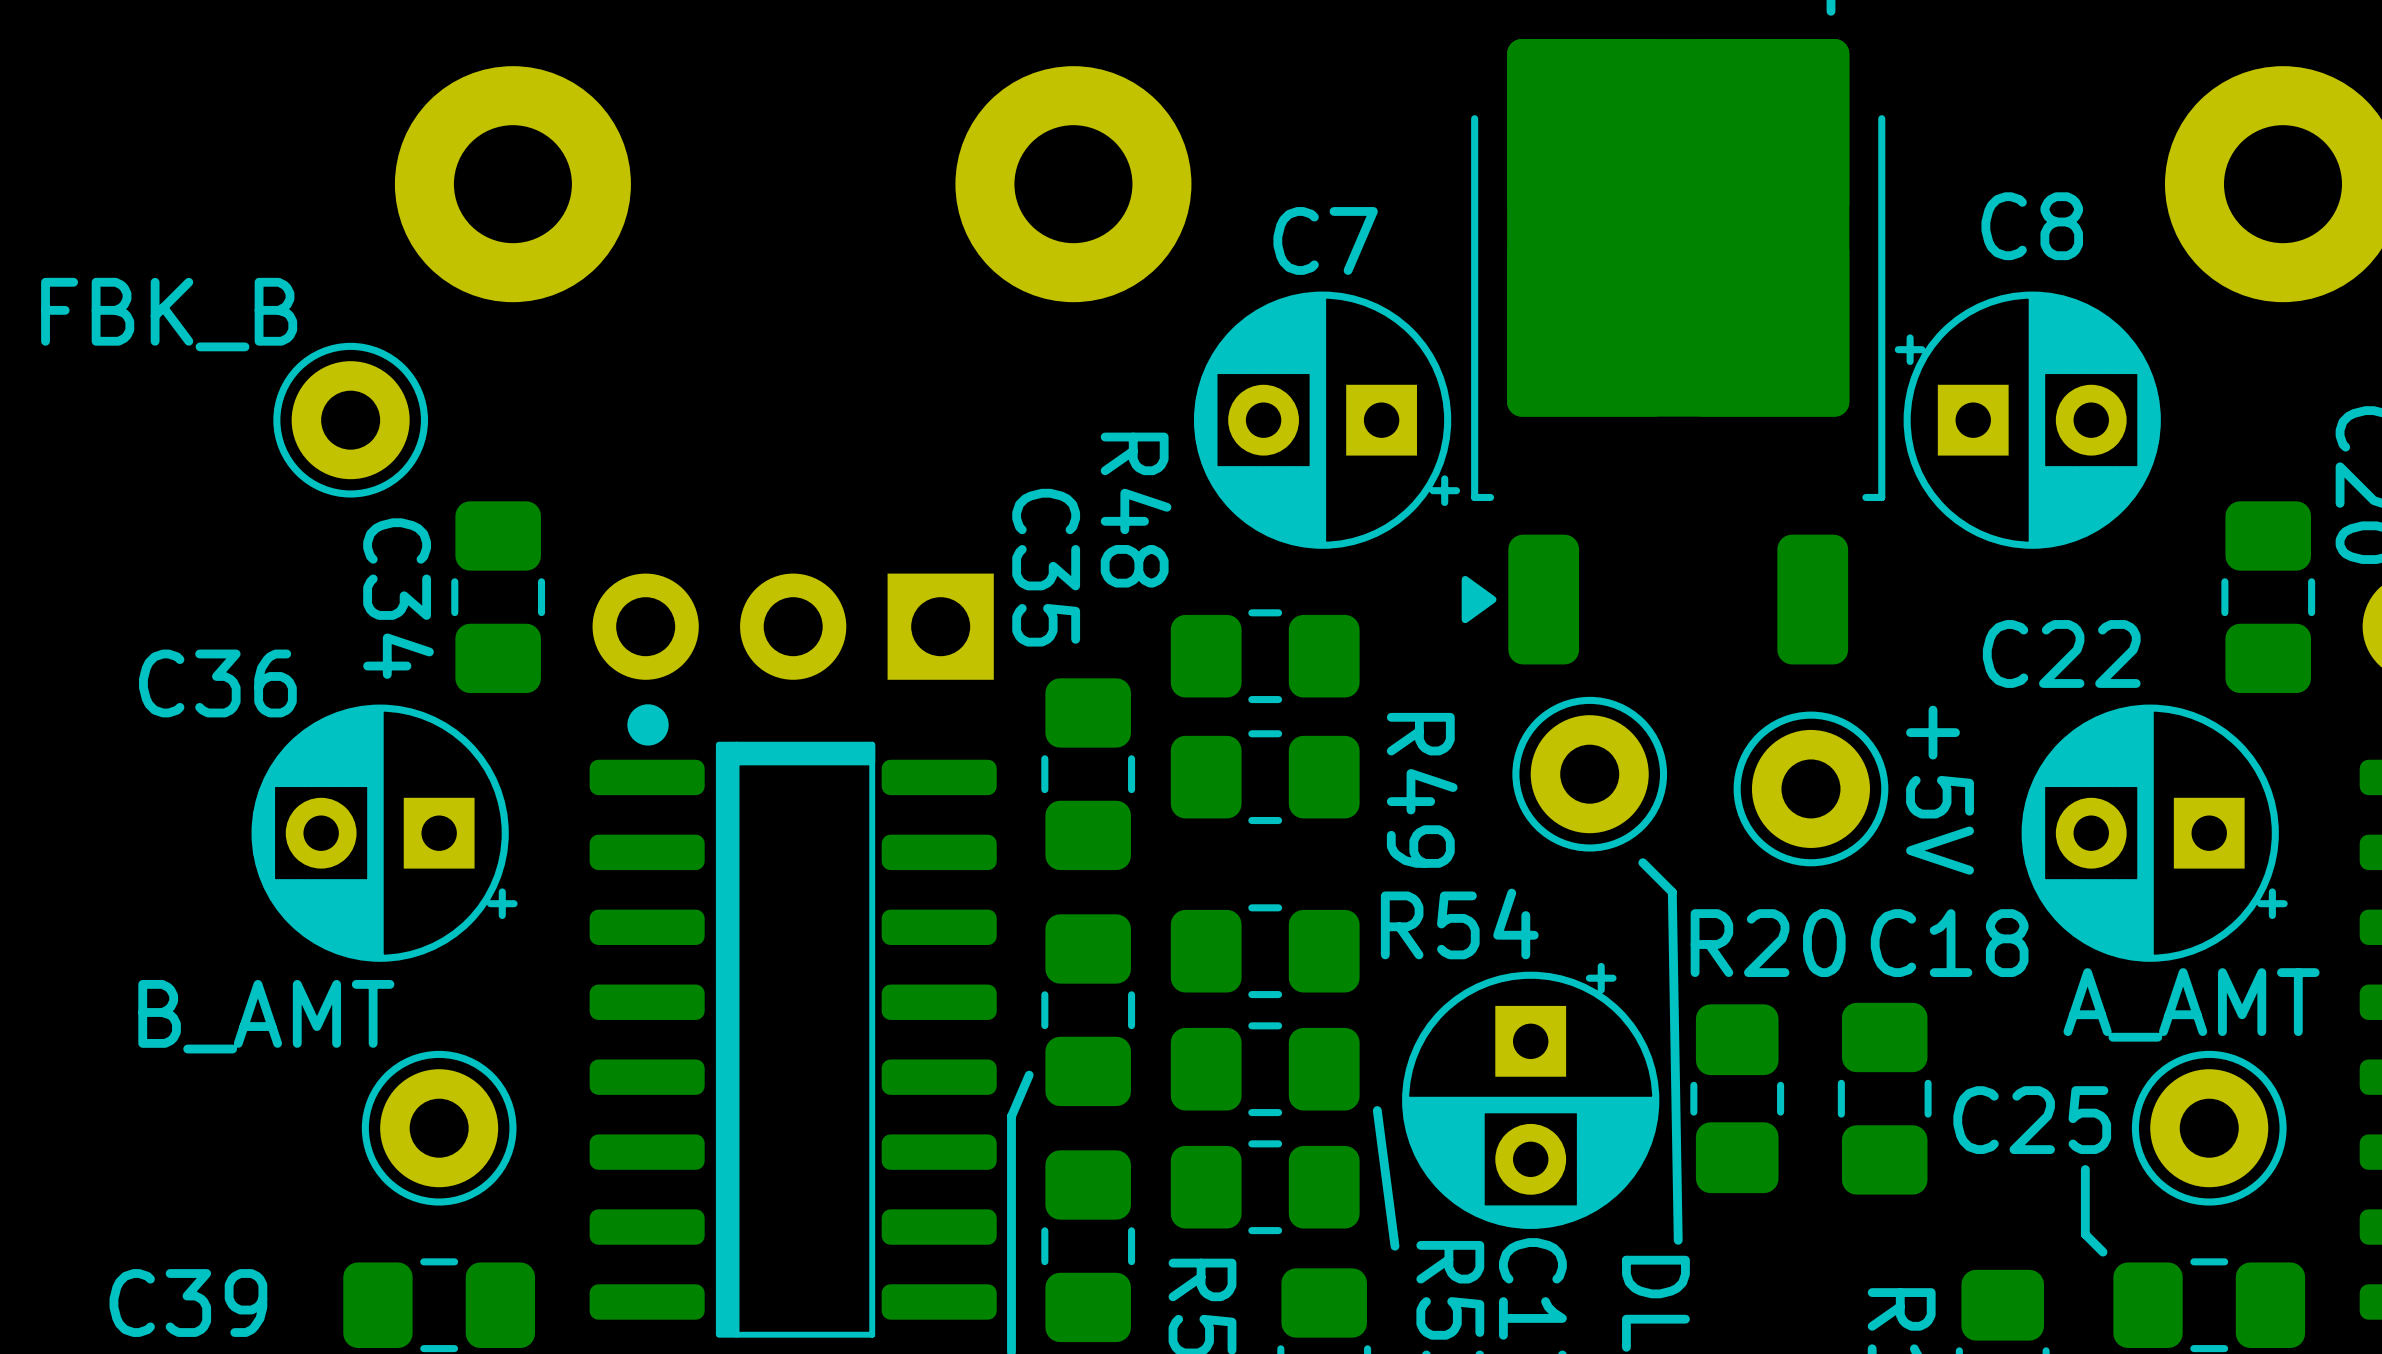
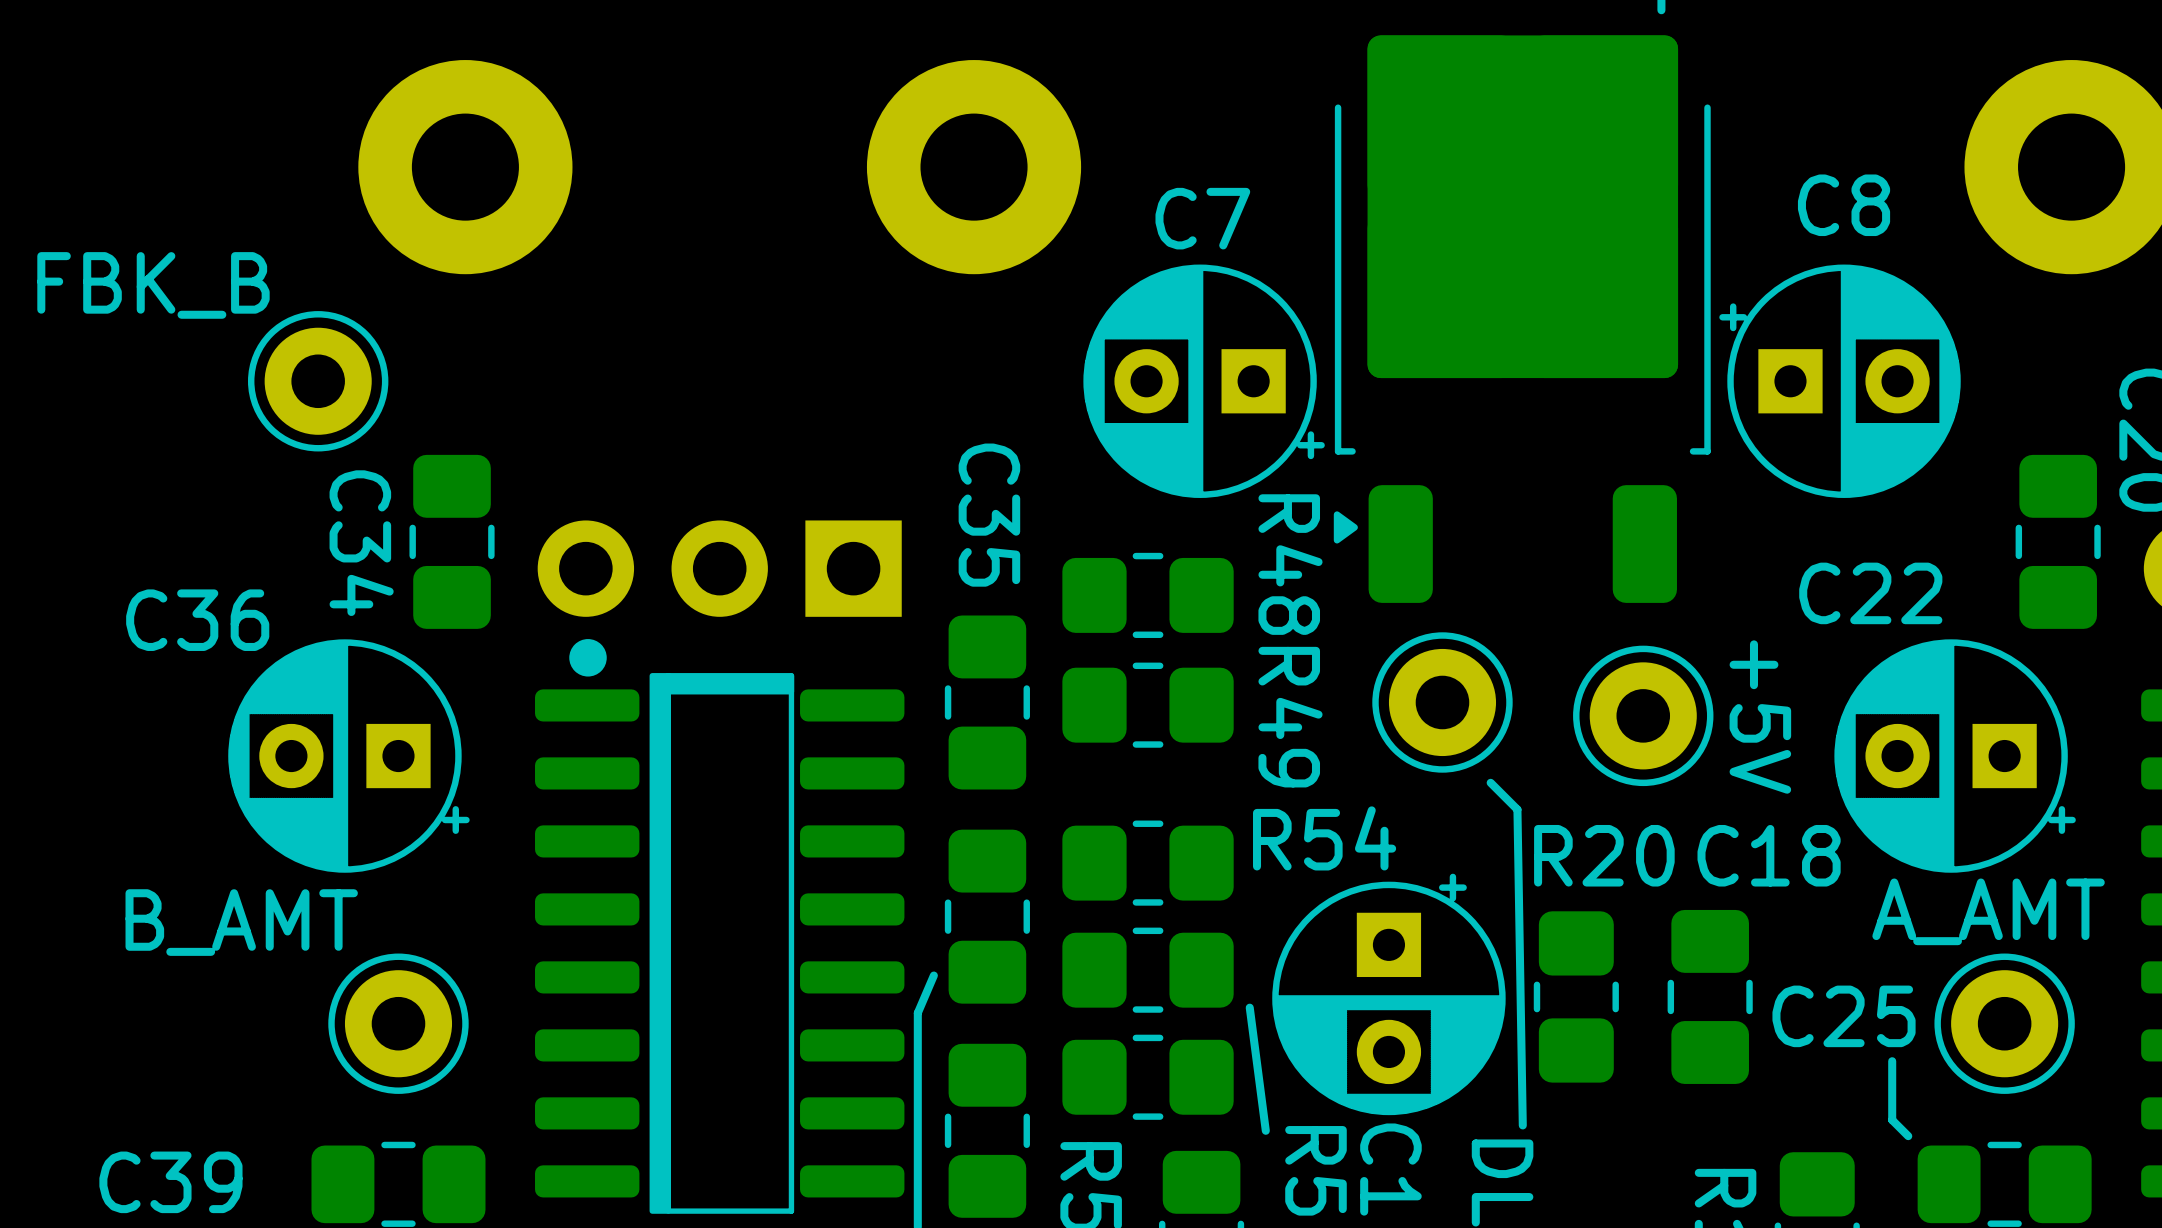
part footprint: [1461, 39, 1886, 665] -> [1333, 35, 1711, 603]
R48 name position: R48 (1136, 510) -> R48 (1290, 564)
C35 name position: C35 (1046, 567) -> C35 (989, 515)

